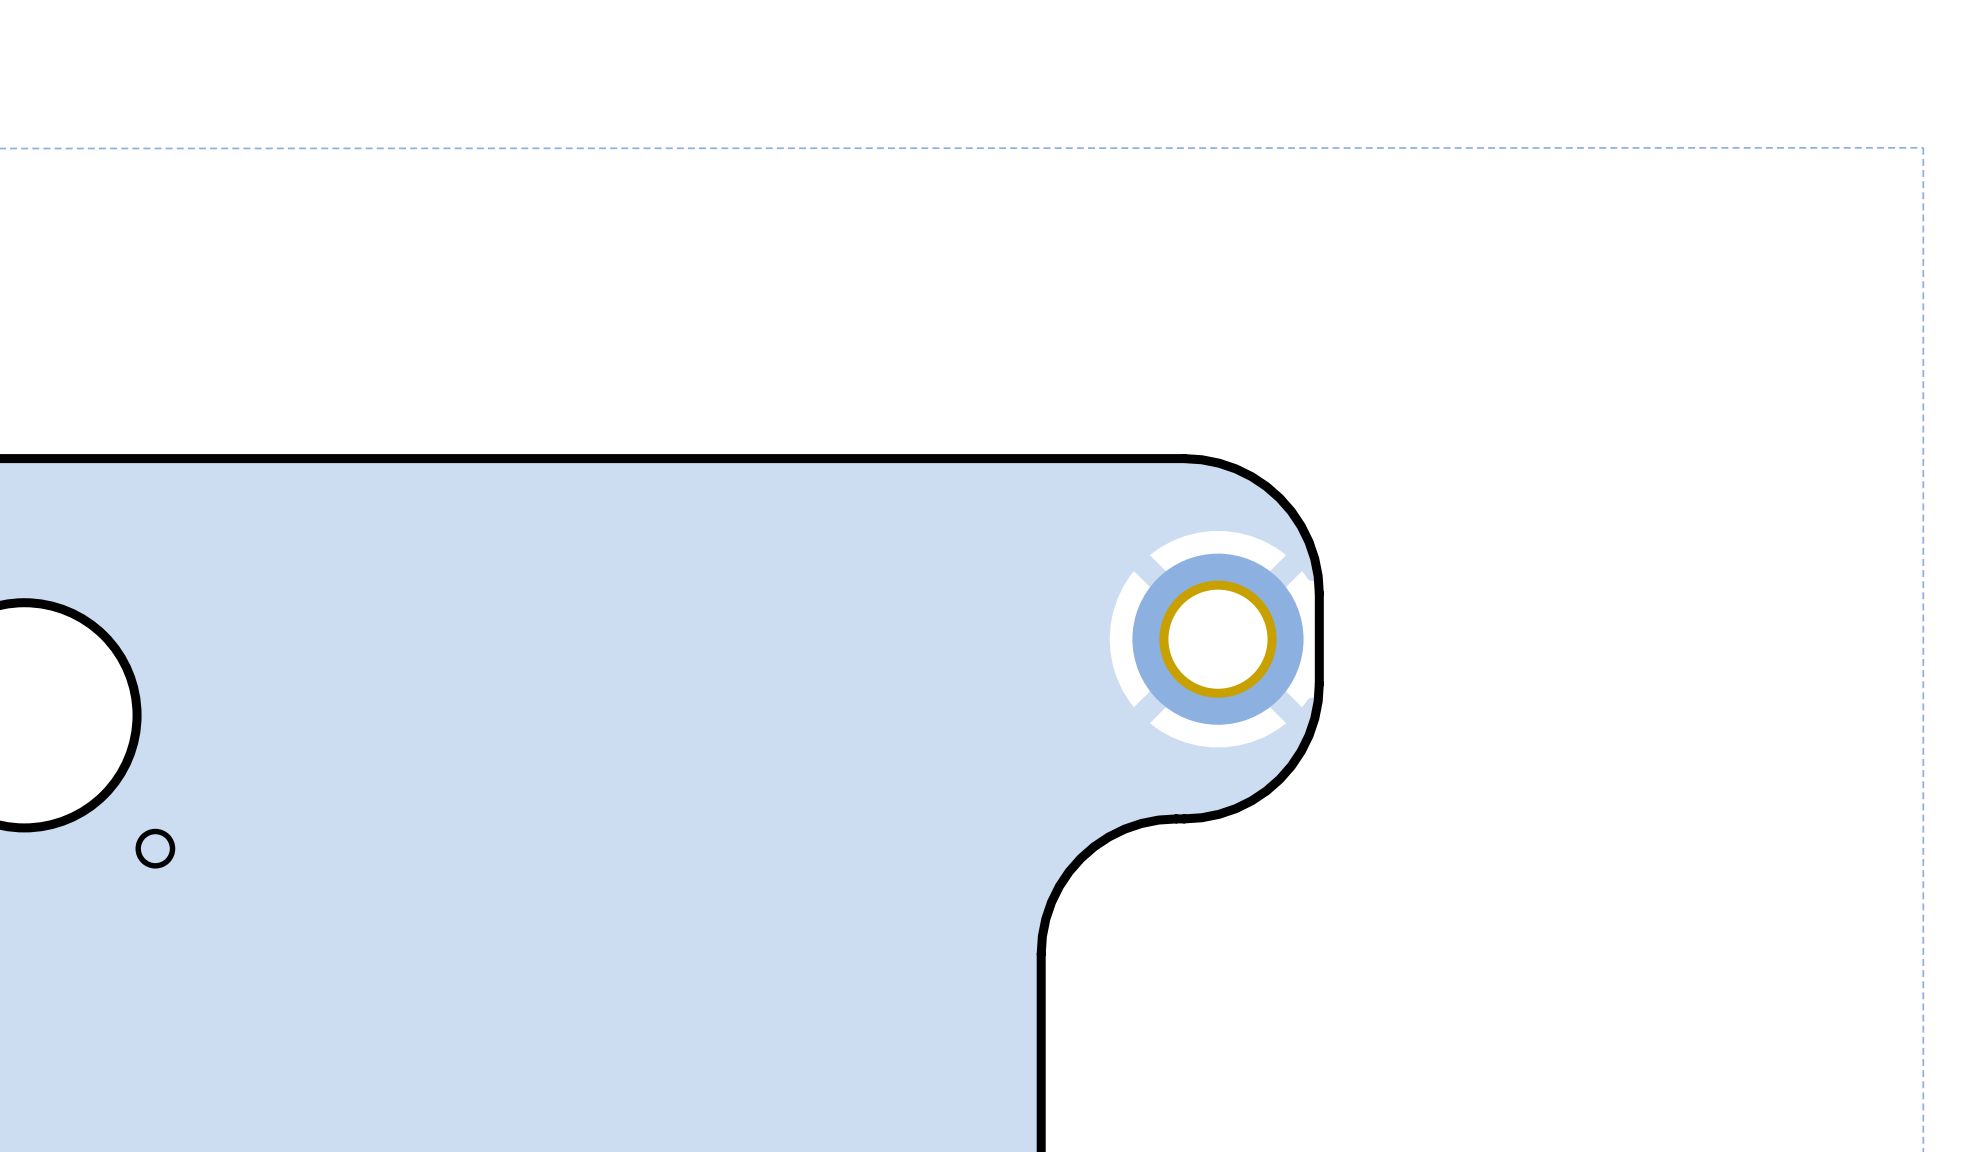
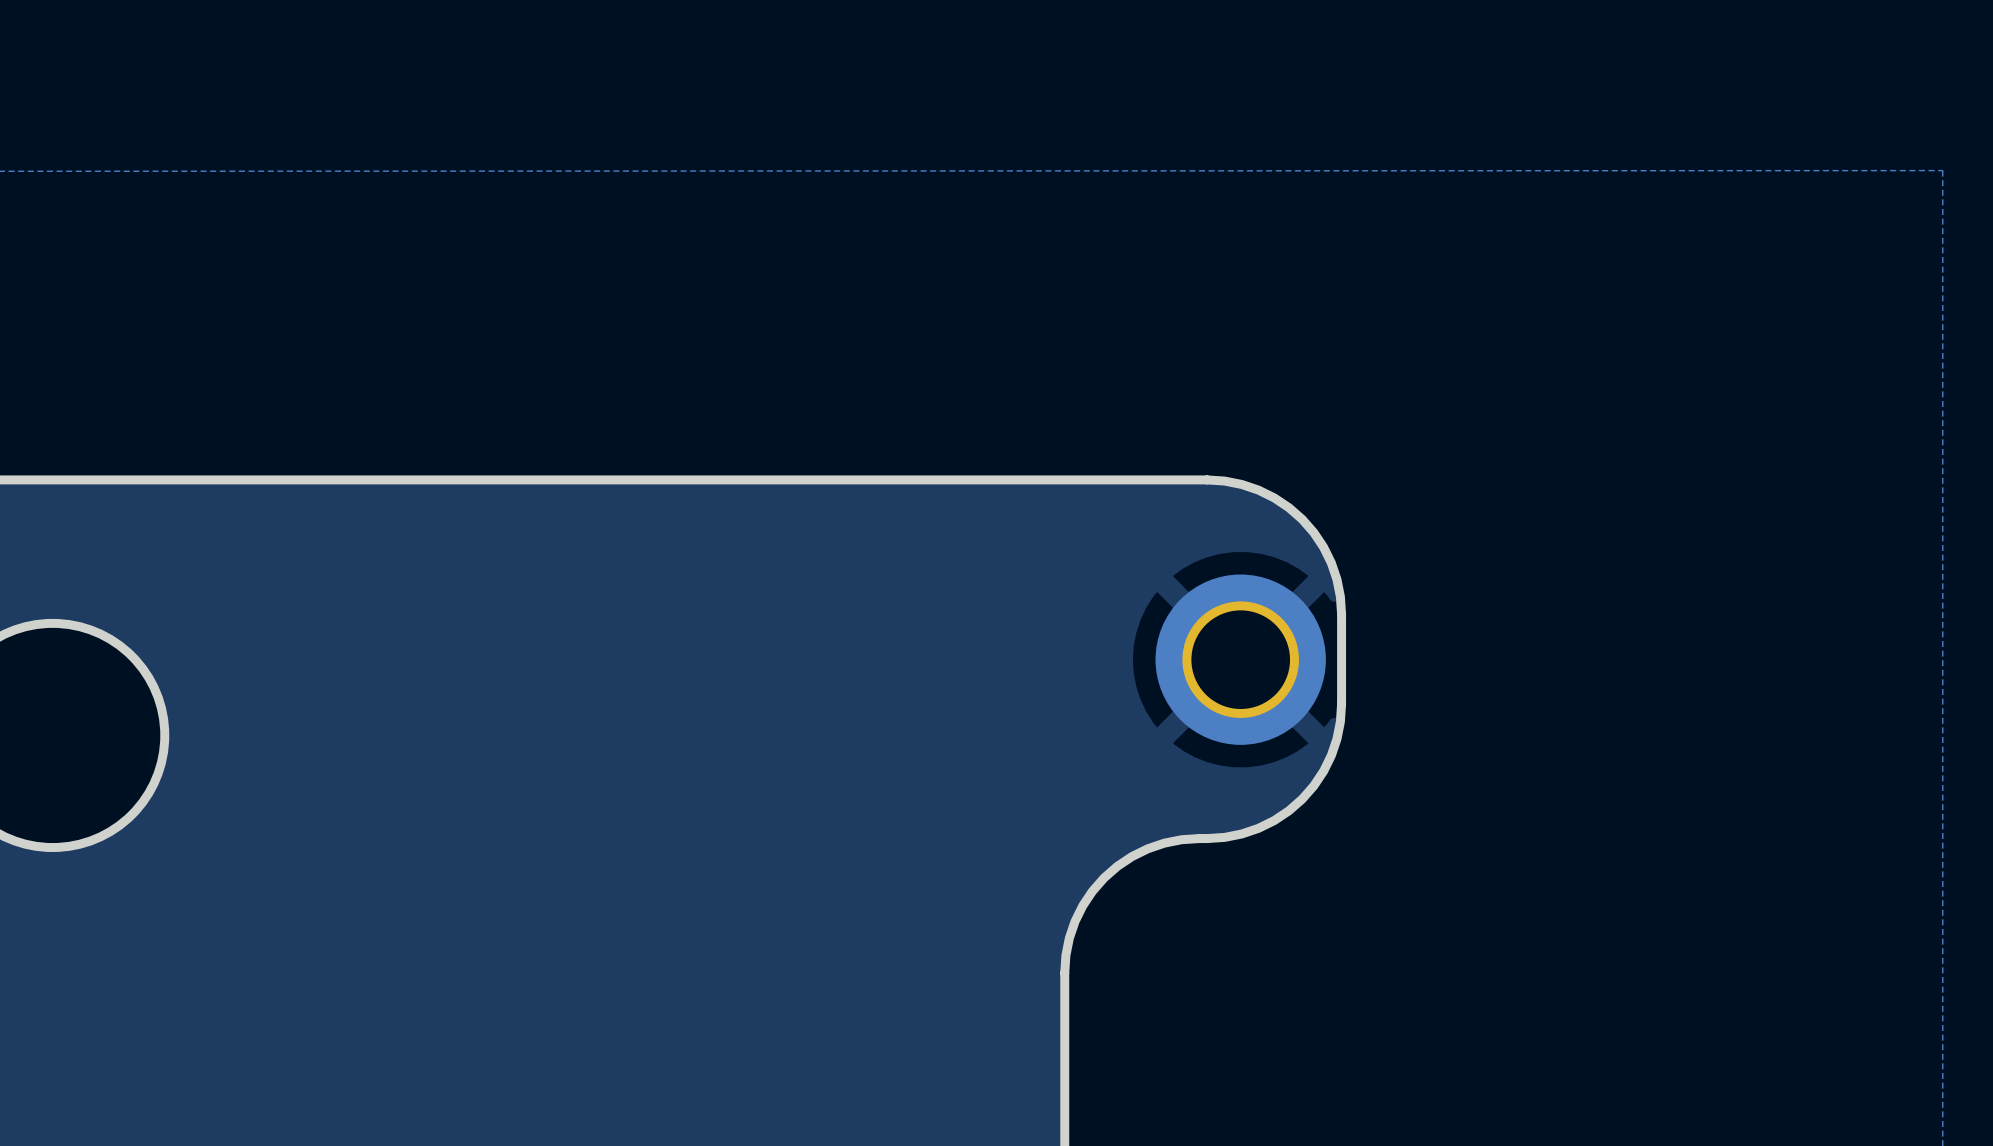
part: (155, 848) -> none

